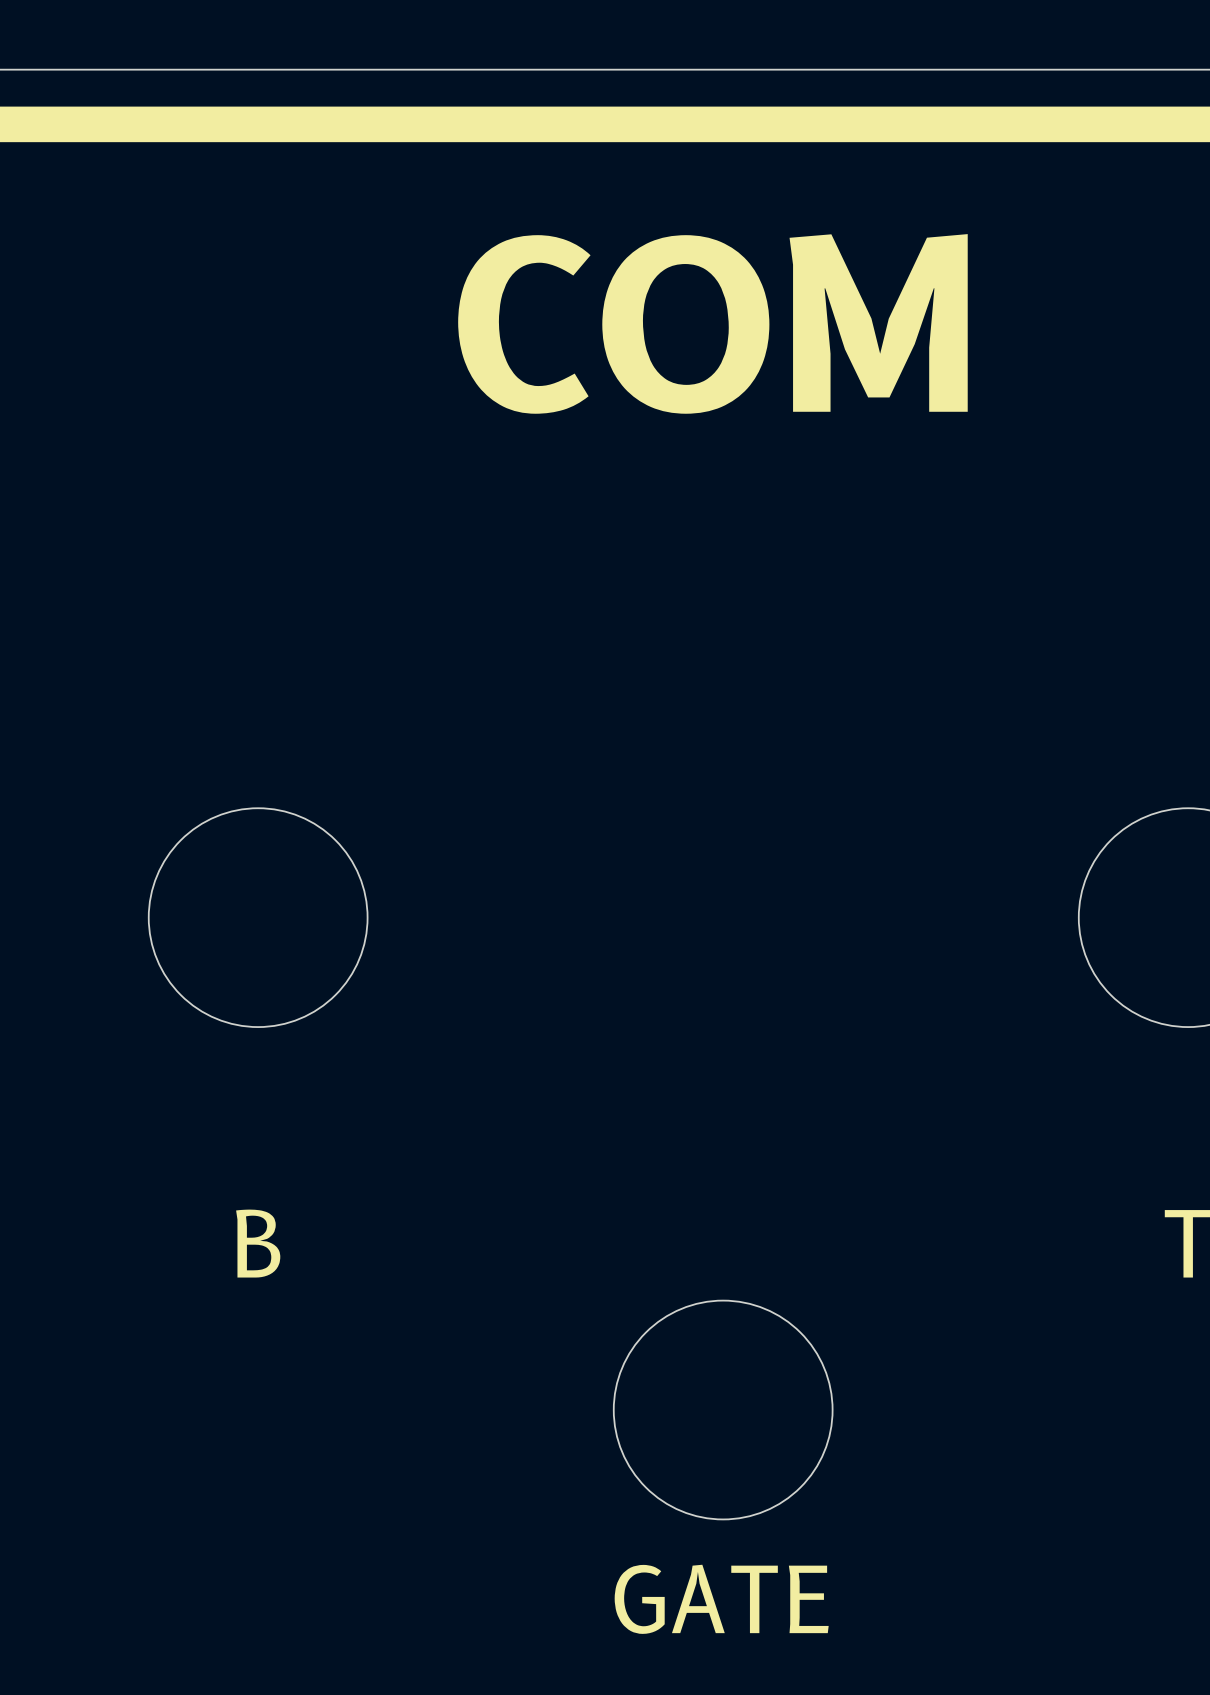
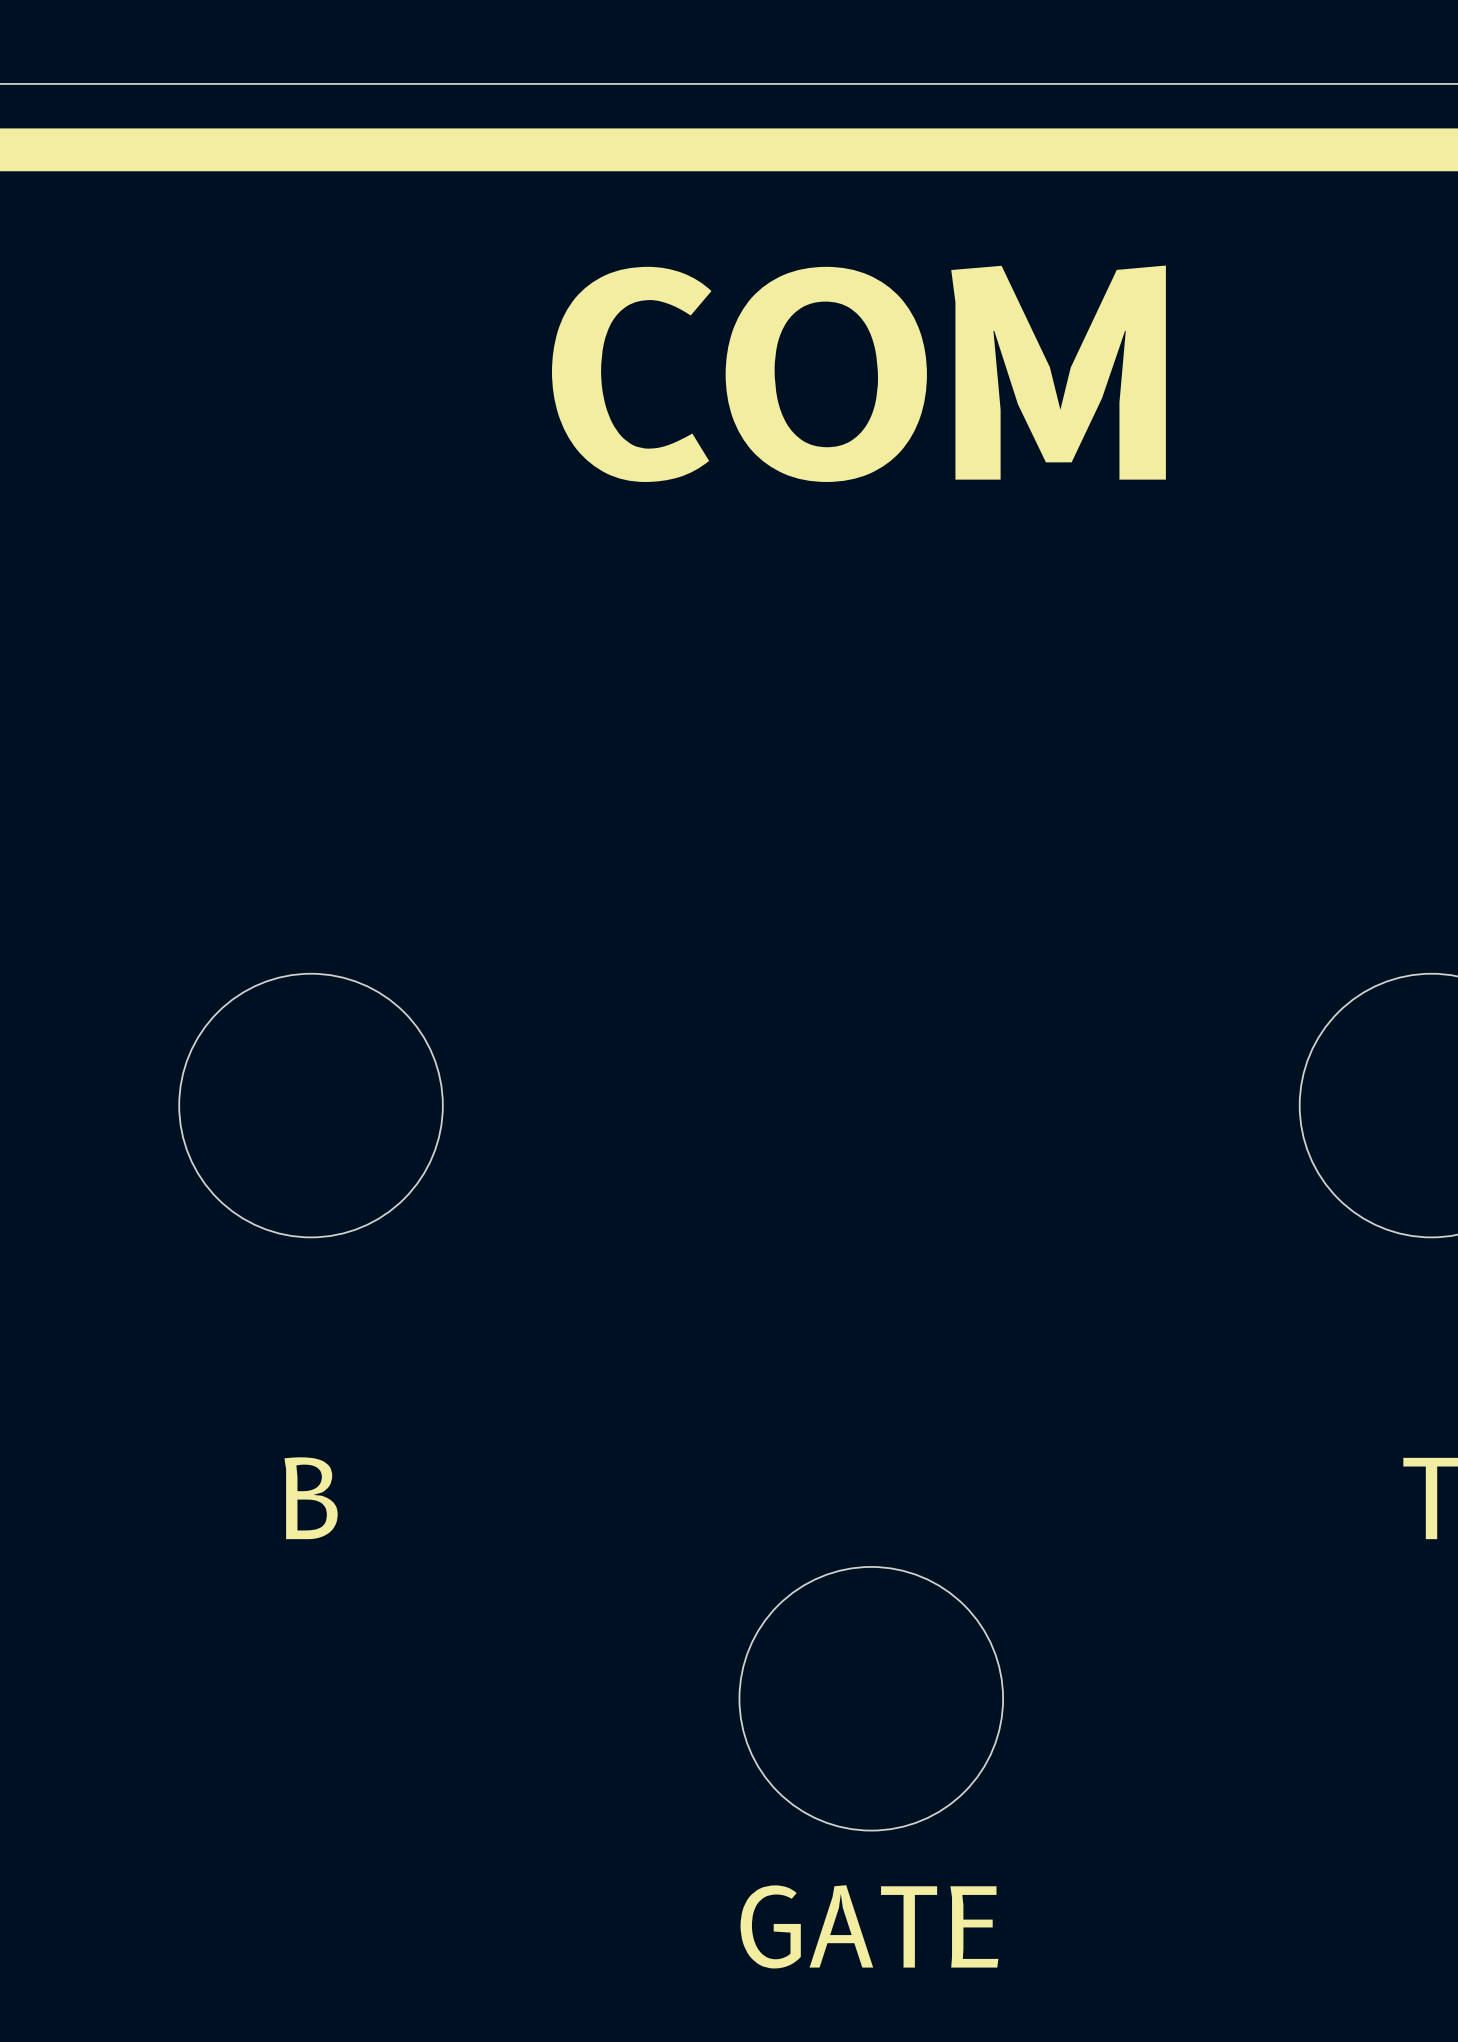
text position: COM (712, 323) -> COM (858, 373)

